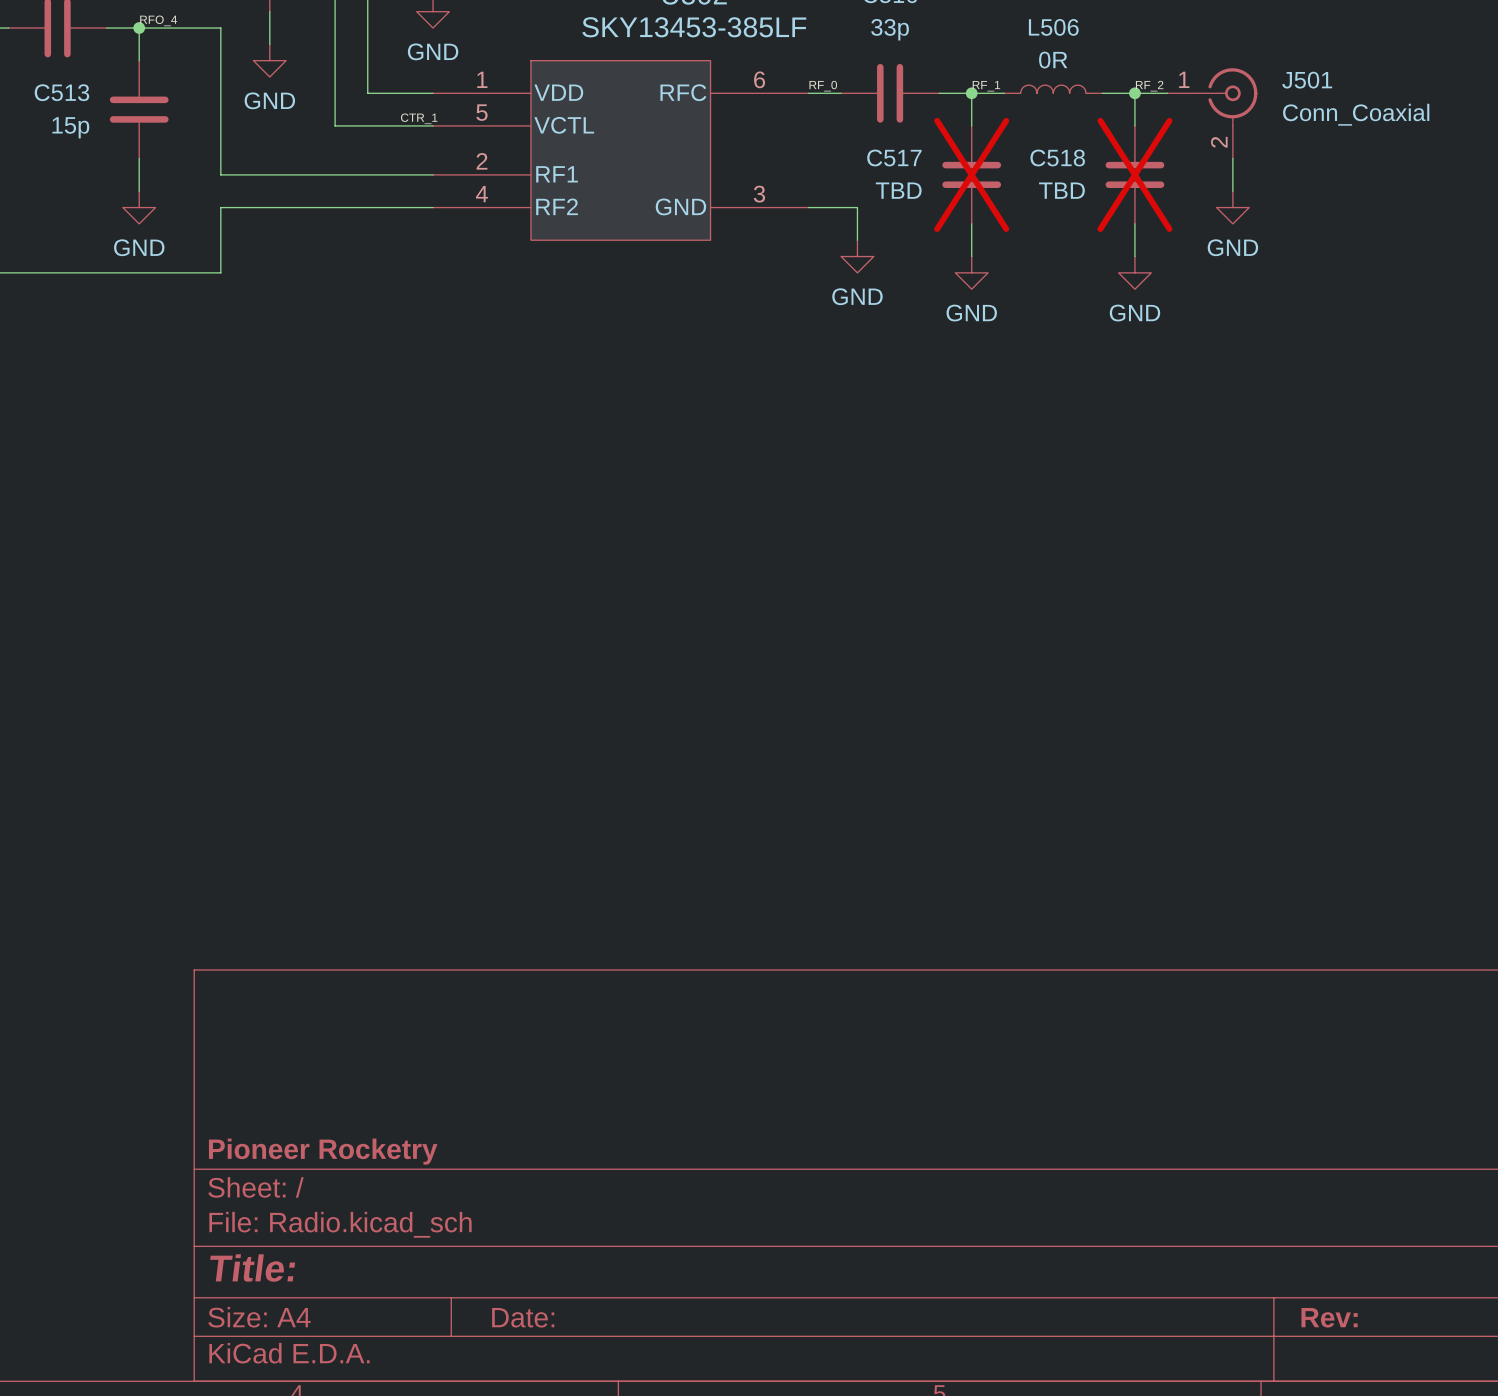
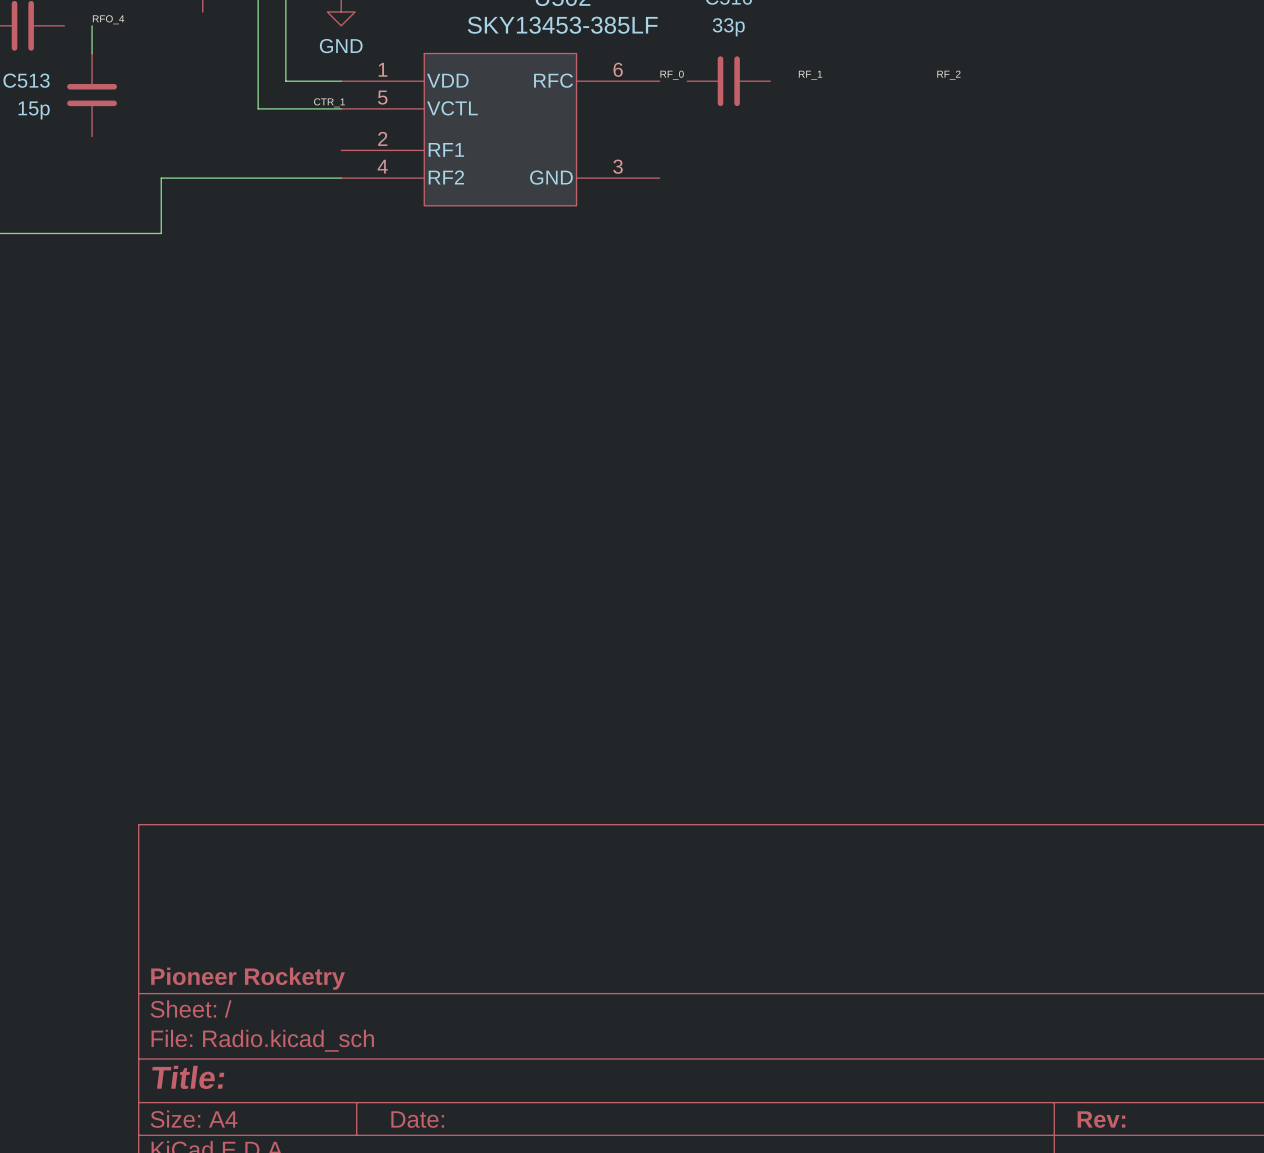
wire: (269, 11) (269, 44) -> none
wire: (106, 28) (220, 28) (220, 174) (433, 174) -> none
junction: (139, 28) -> none
power symbol: GND (269, 60) -> none
L506: 0R (1053, 89) -> none
wire: (808, 93) (841, 93) -> none
wire: (939, 93) (1004, 93) -> none
wire: (971, 93) (971, 125) -> none
junction: (971, 93) -> none
wire: (1102, 93) (1167, 93) -> none
wire: (1134, 93) (1134, 125) -> none
junction: (1134, 93) -> none
J501: Conn_Coaxial (1212, 113) -> none
wire: (139, 158) (139, 191) -> none
wire: (1232, 158) (1232, 191) -> none
C517: TBD (971, 174) -> none
C518: TBD (1134, 174) -> none
power symbol: GND (139, 207) -> none
wire: (808, 207) (857, 207) (857, 240) -> none
power symbol: GND (1232, 207) -> none
wire: (971, 223) (971, 256) -> none
wire: (1134, 223) (1134, 256) -> none
power symbol: GND (857, 256) -> none
power symbol: GND (971, 272) -> none
power symbol: GND (1134, 272) -> none

